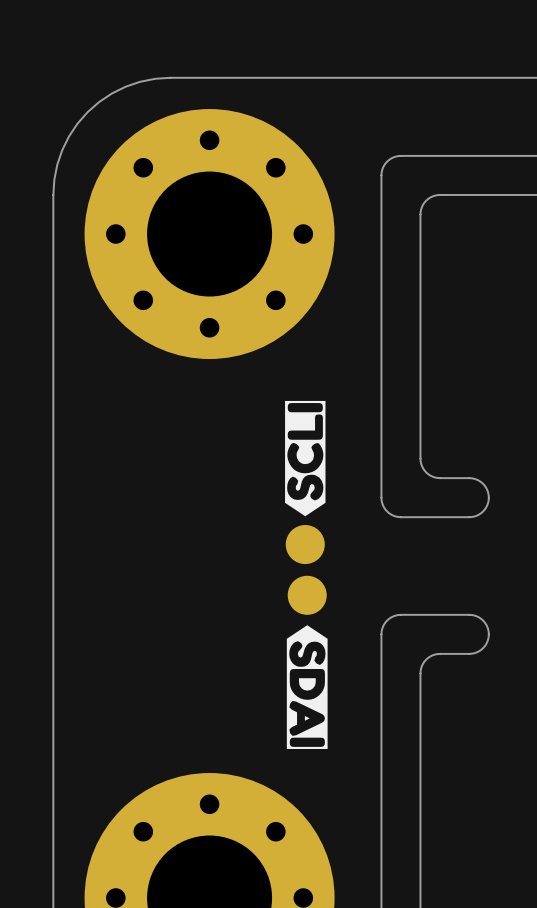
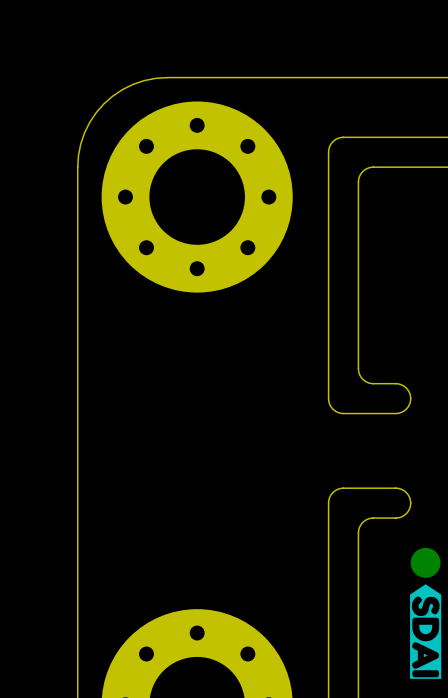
drawing: [285, 400, 326, 517] -> none
part: (305, 544) -> none
part: (307, 595) -> none
drawing position: (307, 687) -> (425, 631)
part: none -> (425, 562)

